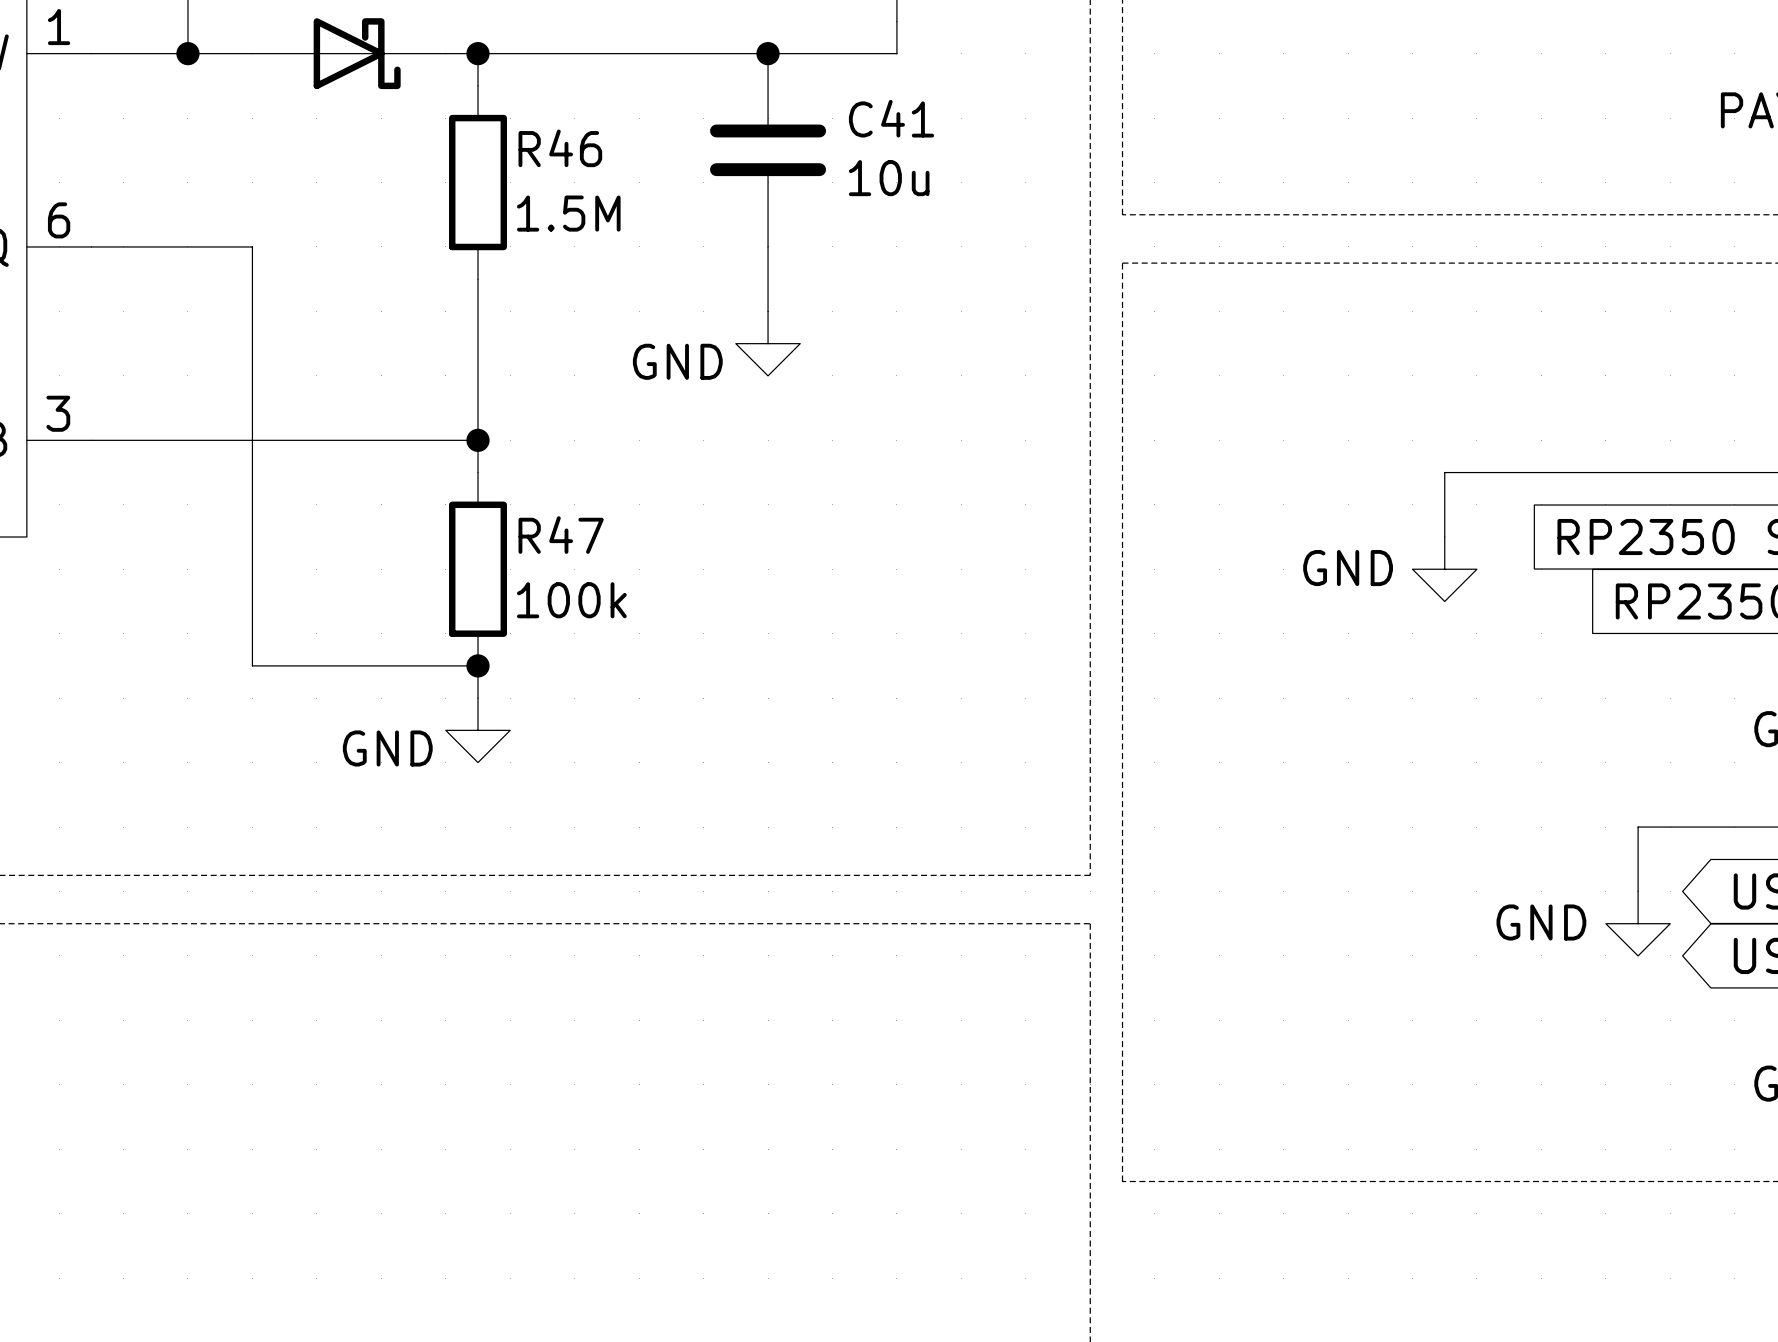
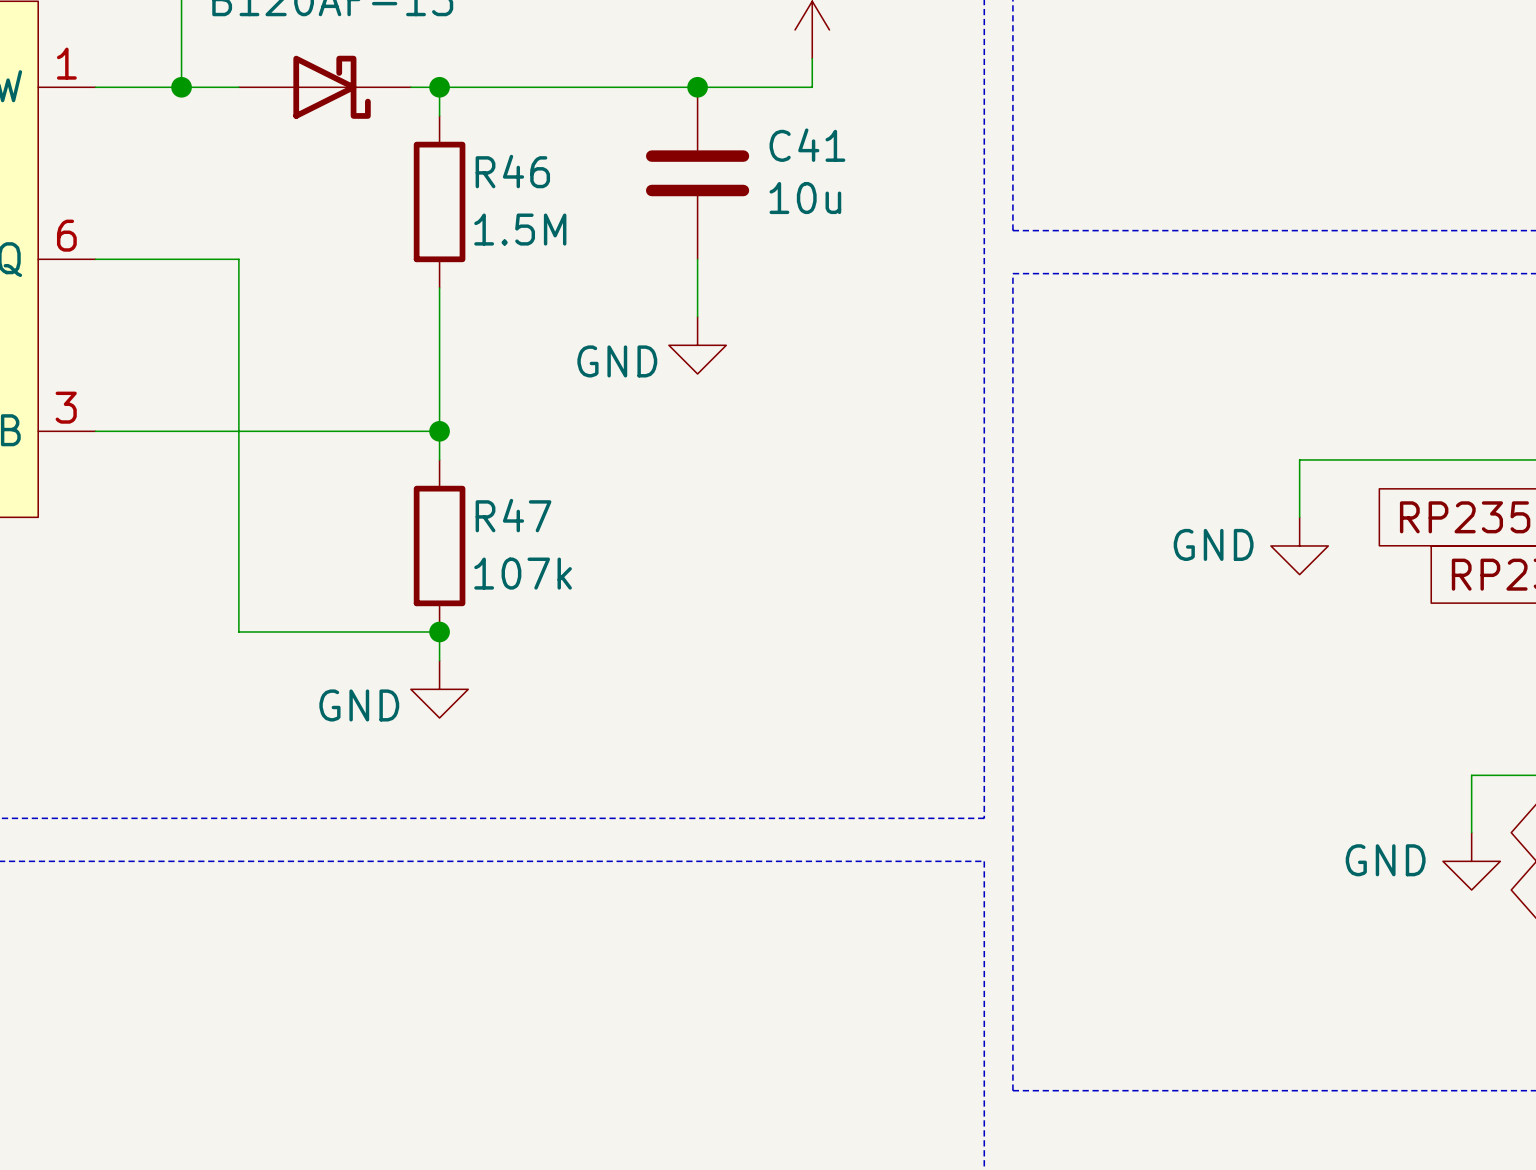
R47 value: 100k (571, 600) -> 107k (523, 573)

